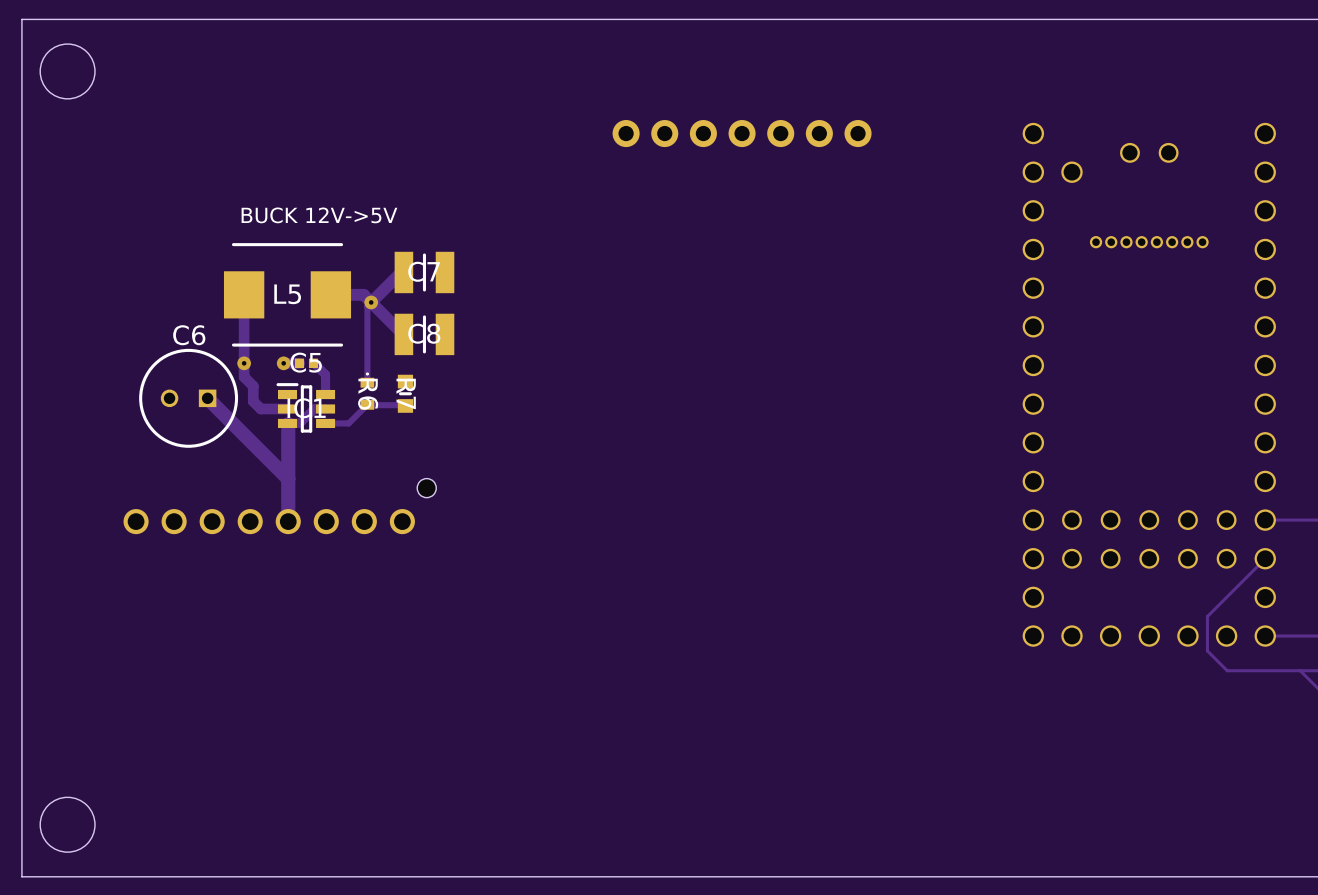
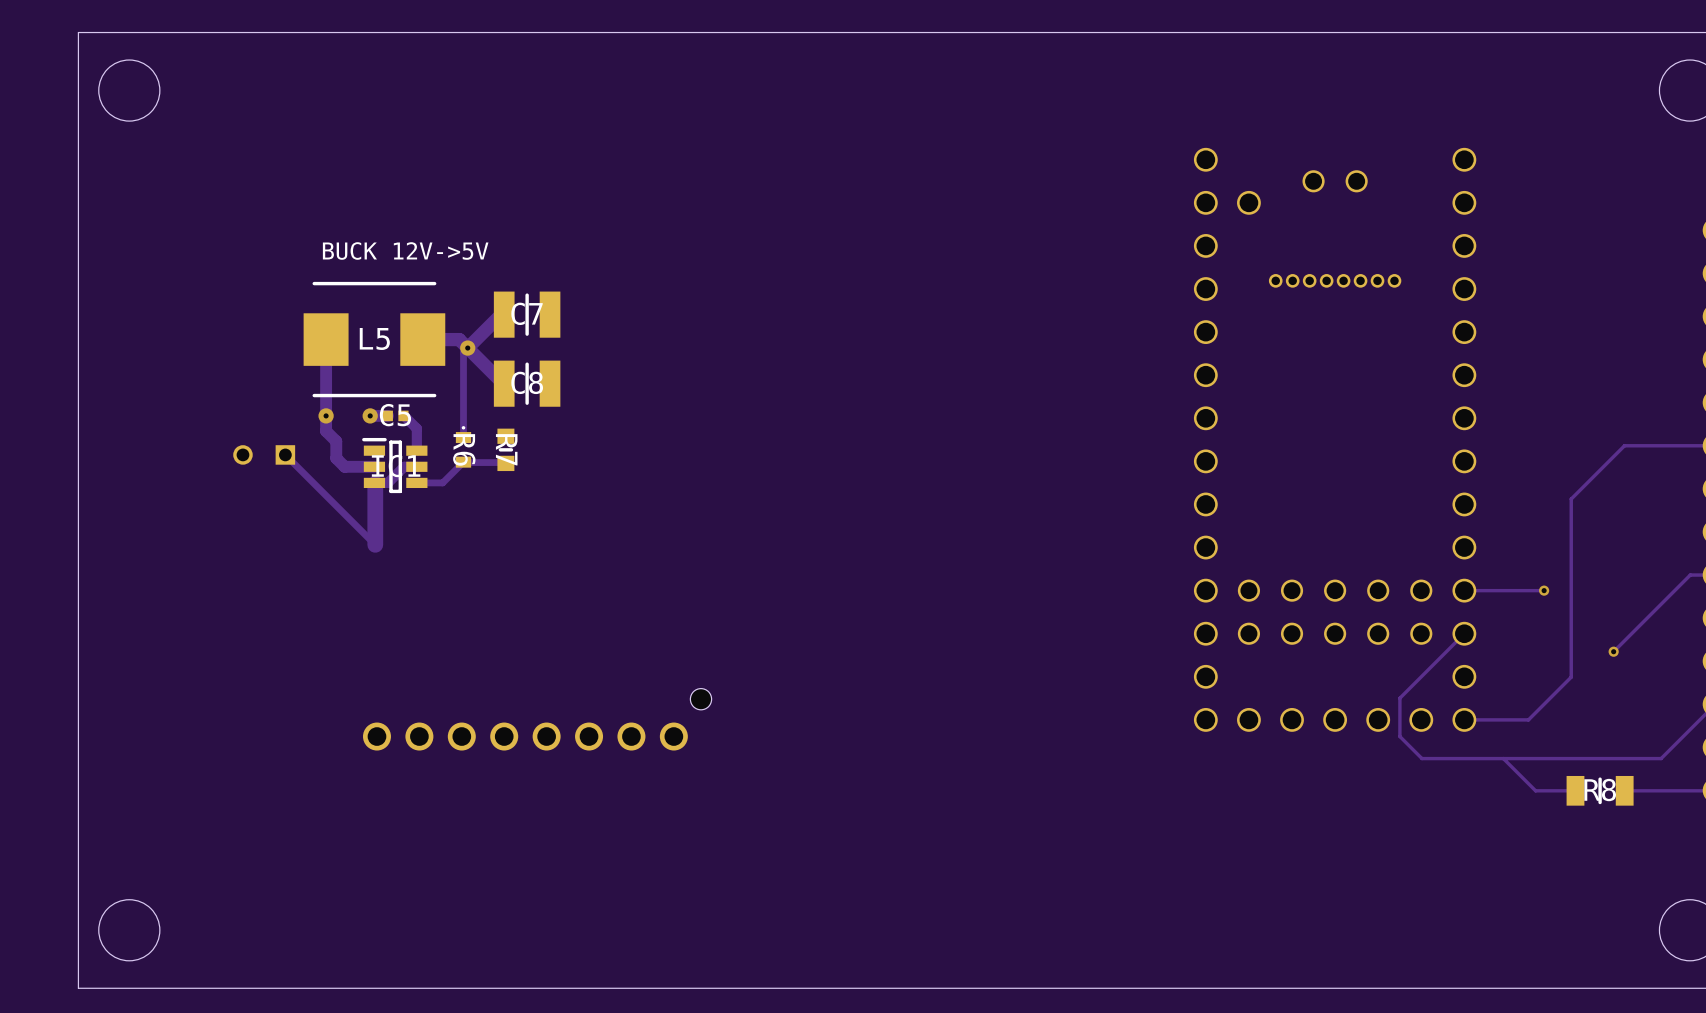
part: (742, 133) -> none
C6 side: bottom (188, 398) -> top (264, 454)
track width: thick (207, 398) (288, 478) -> thin (285, 454) (375, 544)
track: (288, 478) (288, 521) -> none
part position: (279, 506) -> (537, 719)

